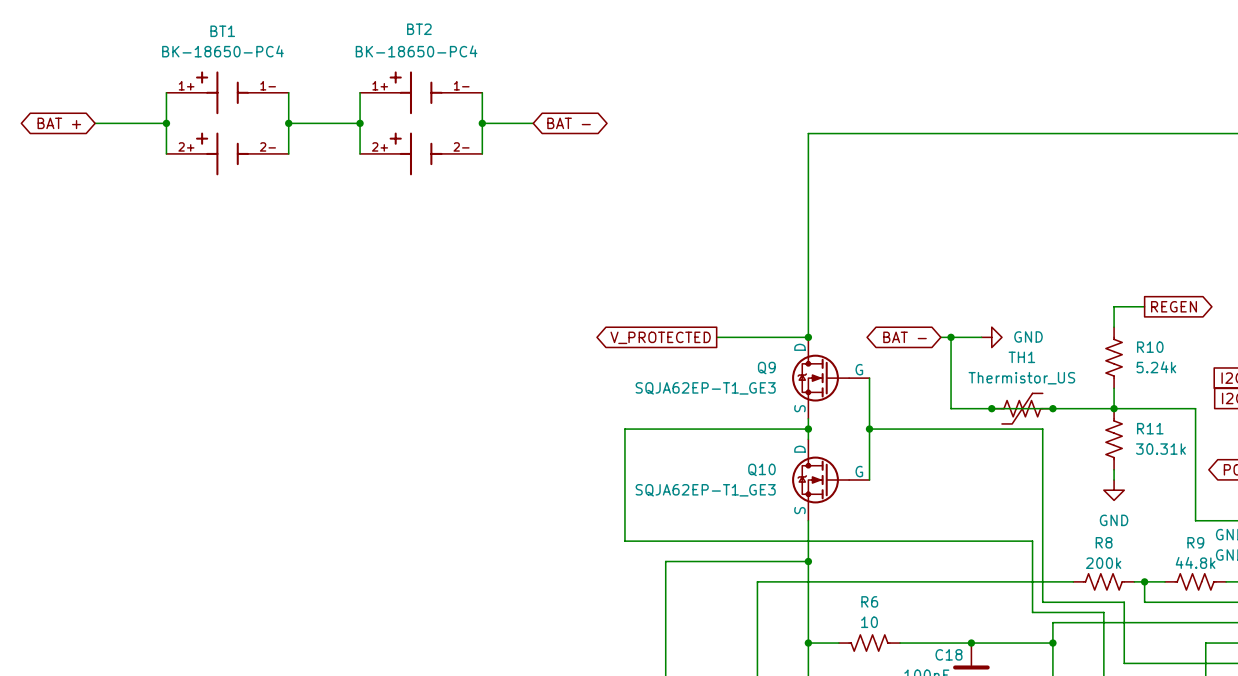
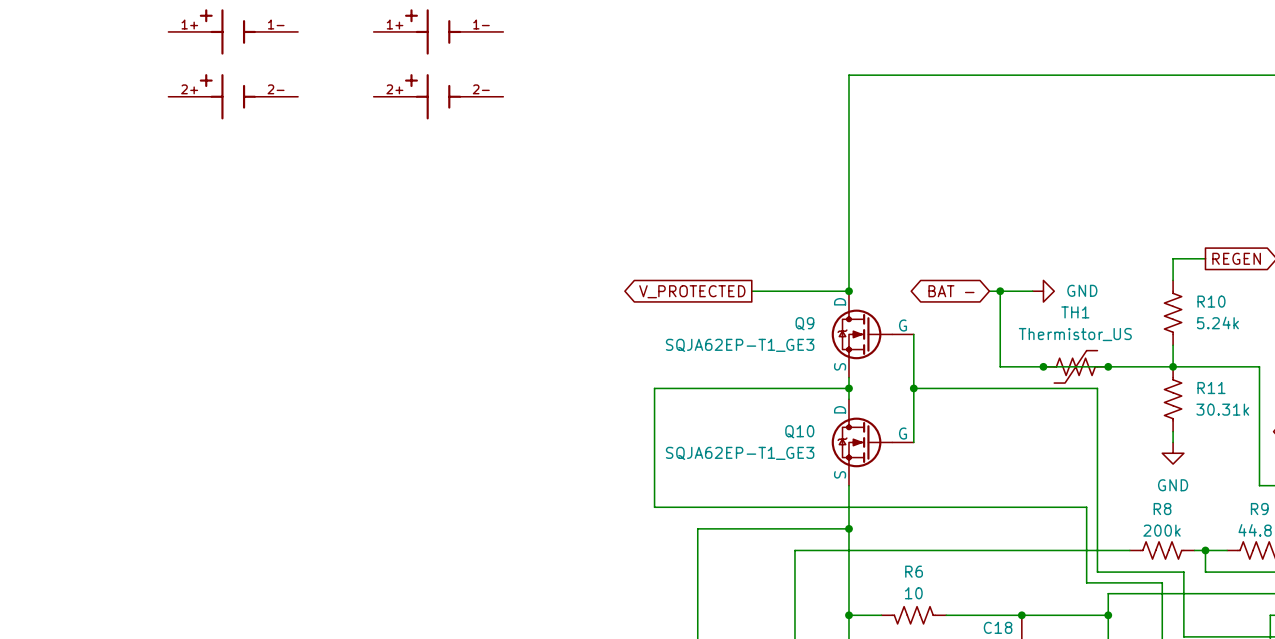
wire: (166, 92) (166, 153) -> none
wire: (288, 92) (288, 153) -> none
wire: (360, 92) (360, 153) -> none
wire: (482, 92) (482, 153) -> none
global label: BAT + (59, 123) -> none
wire: (95, 123) (166, 123) -> none
junction: (166, 123) -> none
wire: (288, 123) (360, 123) -> none
junction: (288, 123) -> none
junction: (360, 123) -> none
wire: (482, 123) (533, 123) -> none
junction: (482, 123) -> none
global label: BAT - (569, 123) -> none

